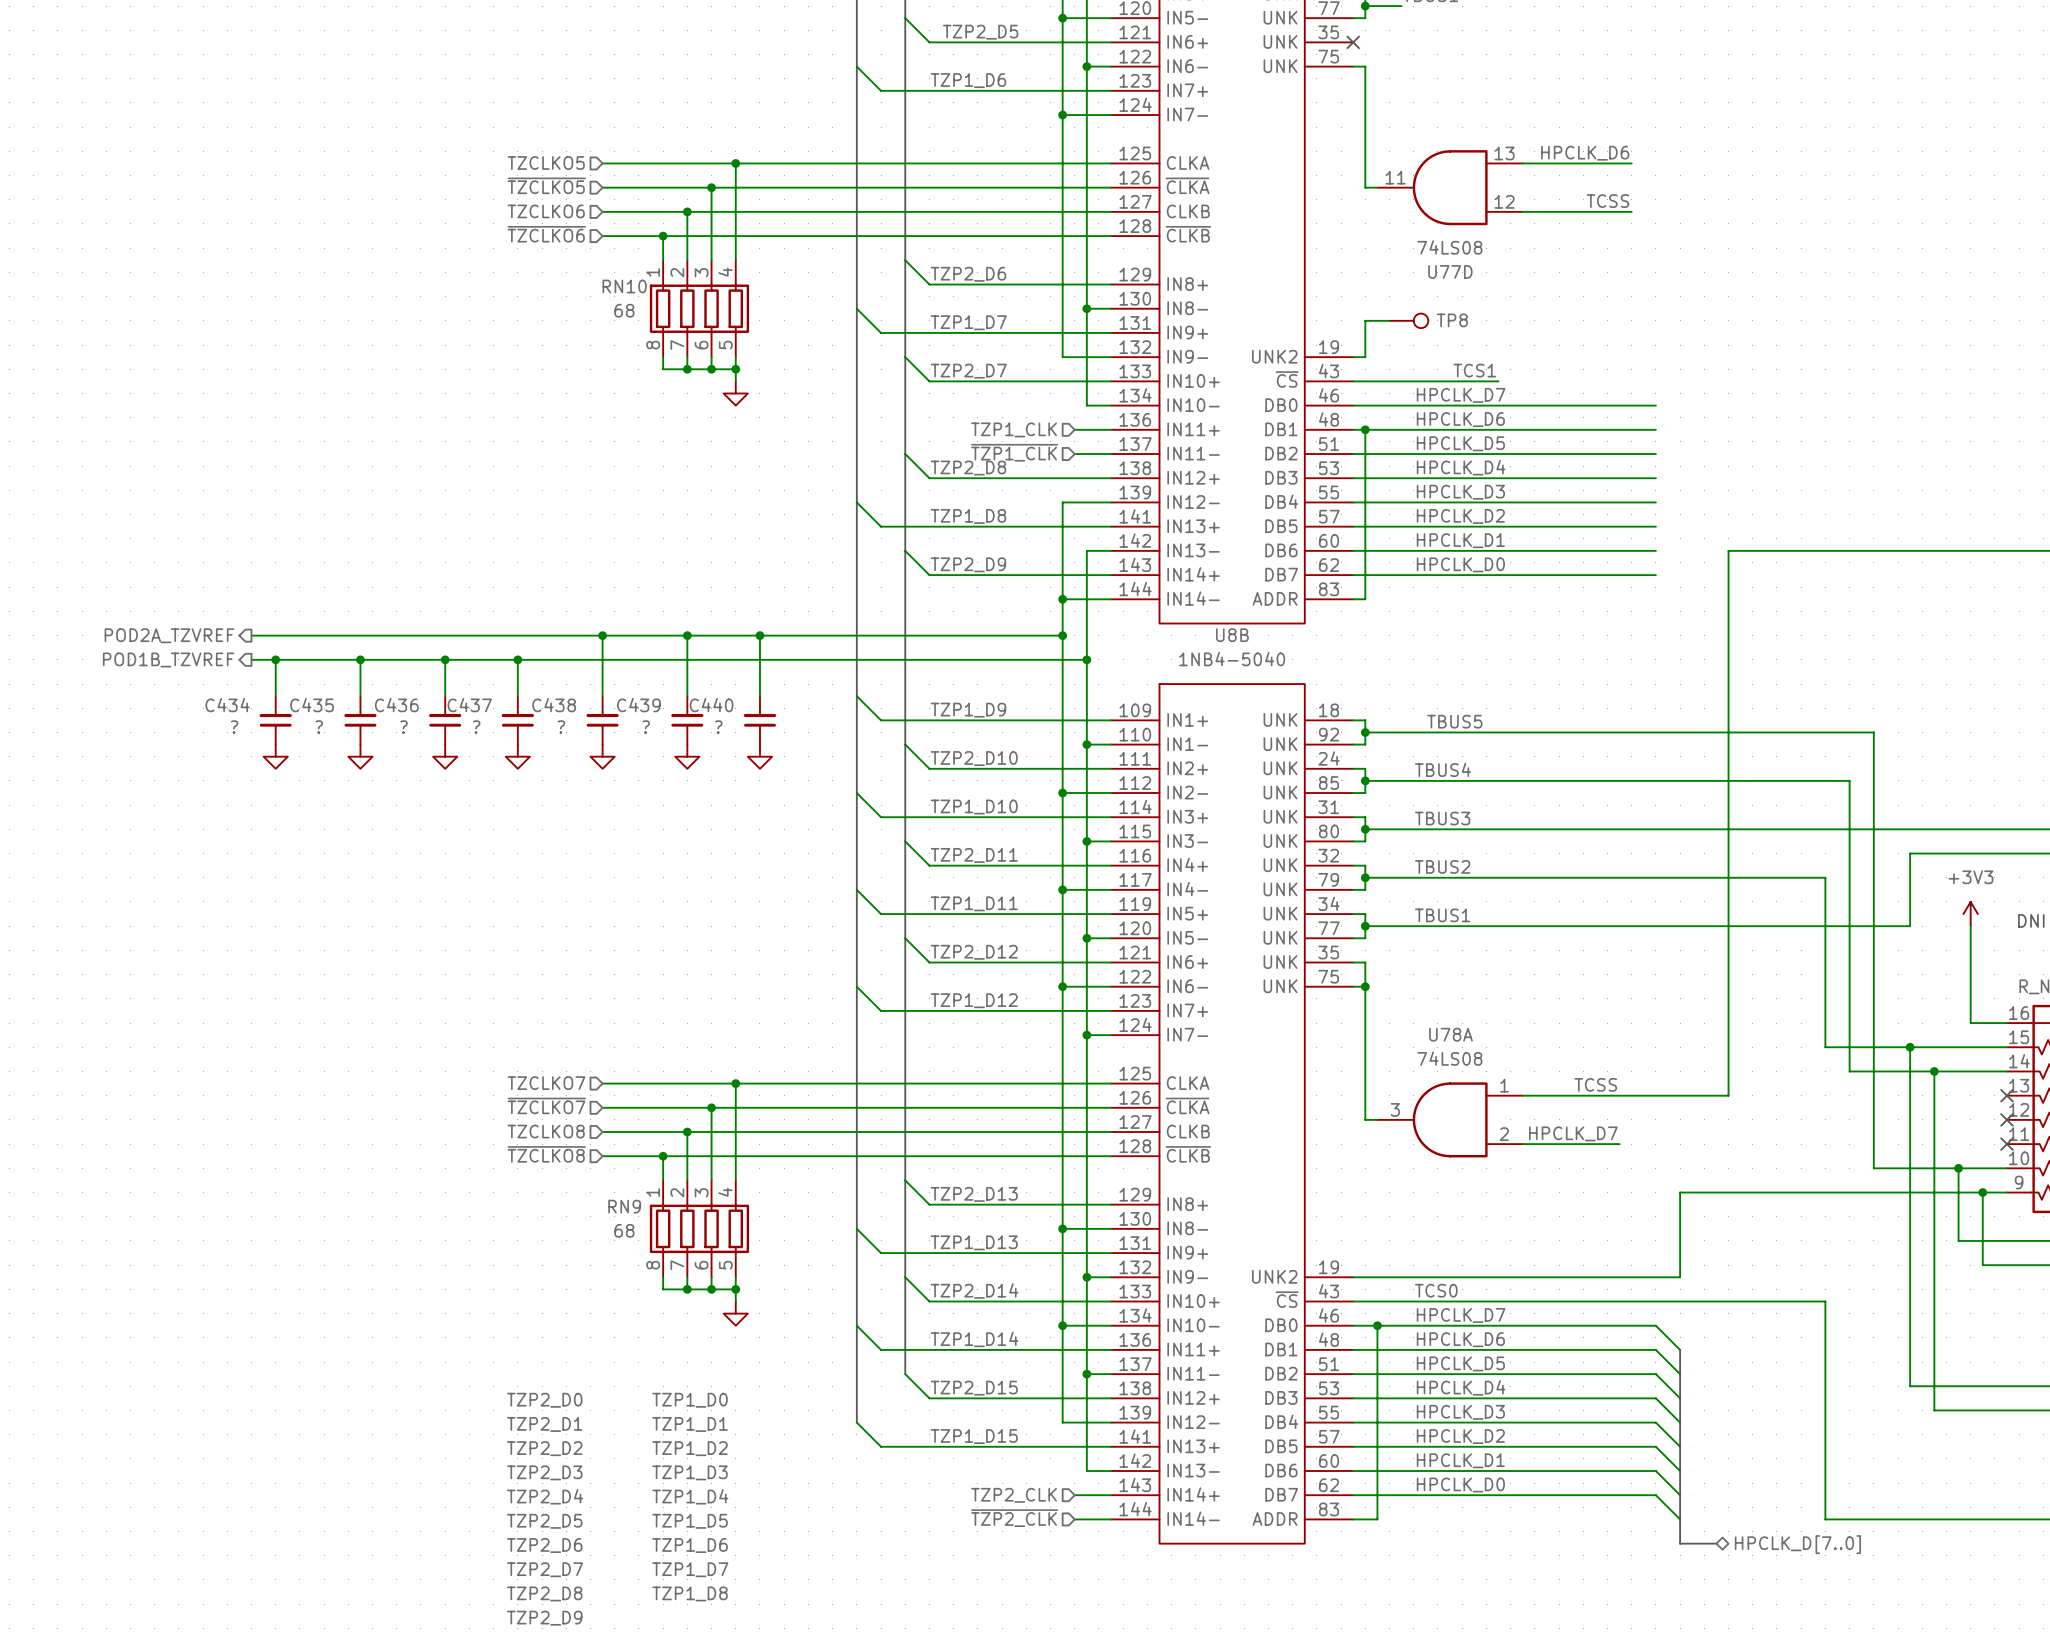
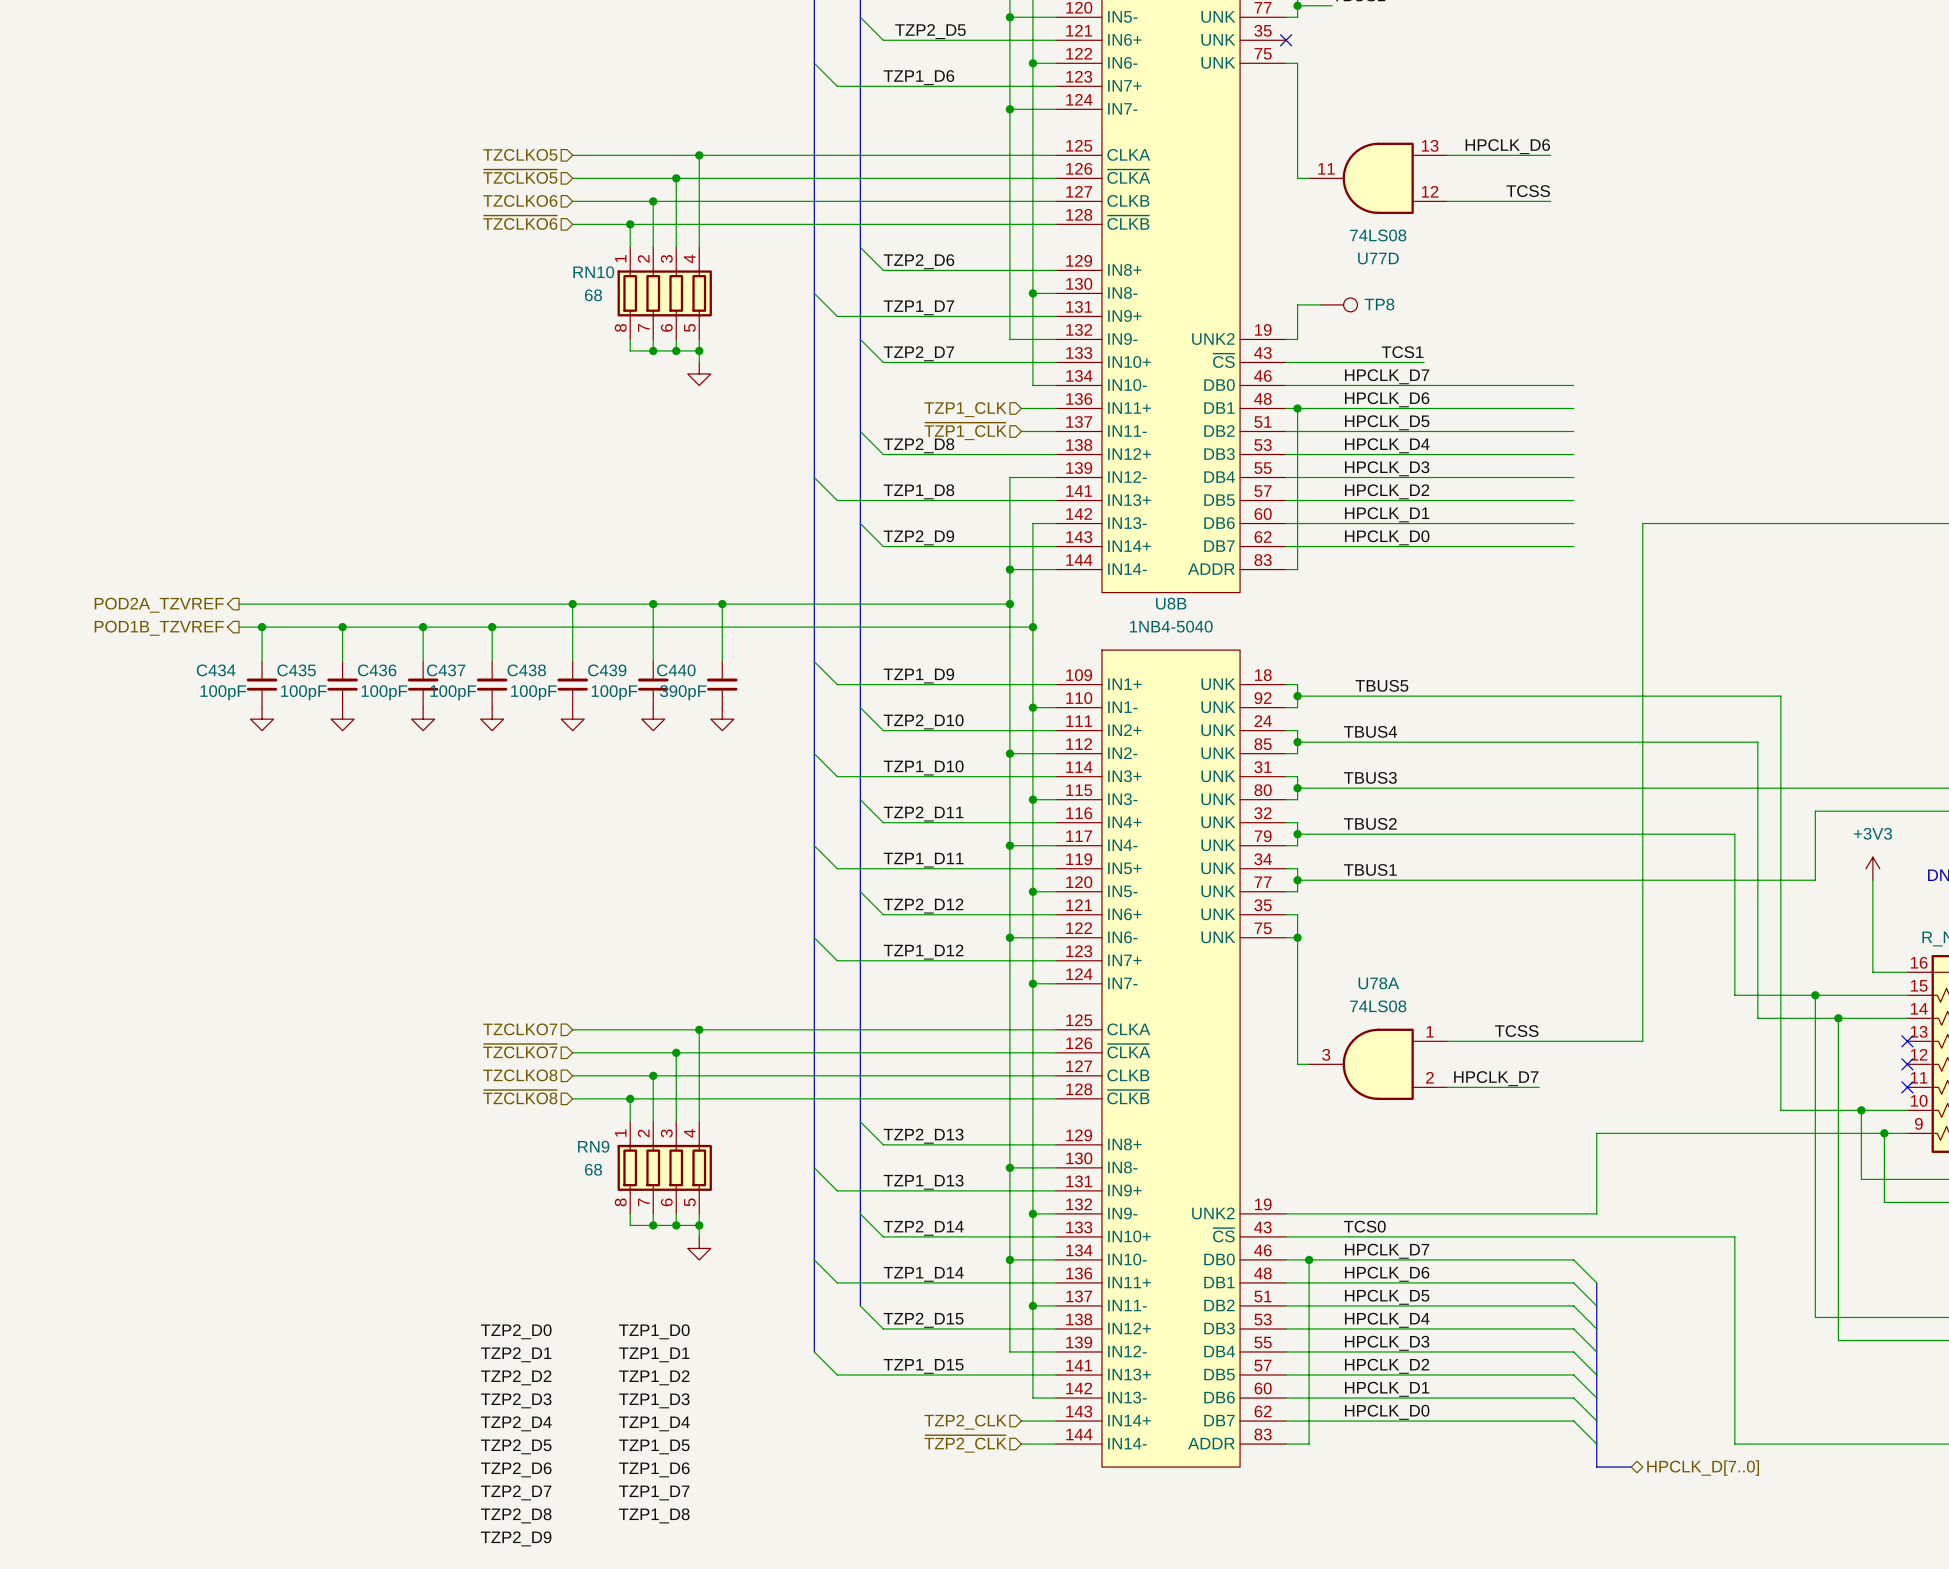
C434 value: ? (234, 727) -> 100pF (223, 692)
C435 value: ? (319, 727) -> 100pF (303, 692)
C436 value: ? (404, 727) -> 100pF (384, 692)
C437 value: ? (476, 727) -> 100pF (453, 692)
C438 value: ? (561, 727) -> 100pF (533, 692)
C439 value: ? (646, 727) -> 100pF (614, 692)
C440 value: ? (718, 727) -> 390pF (683, 692)

